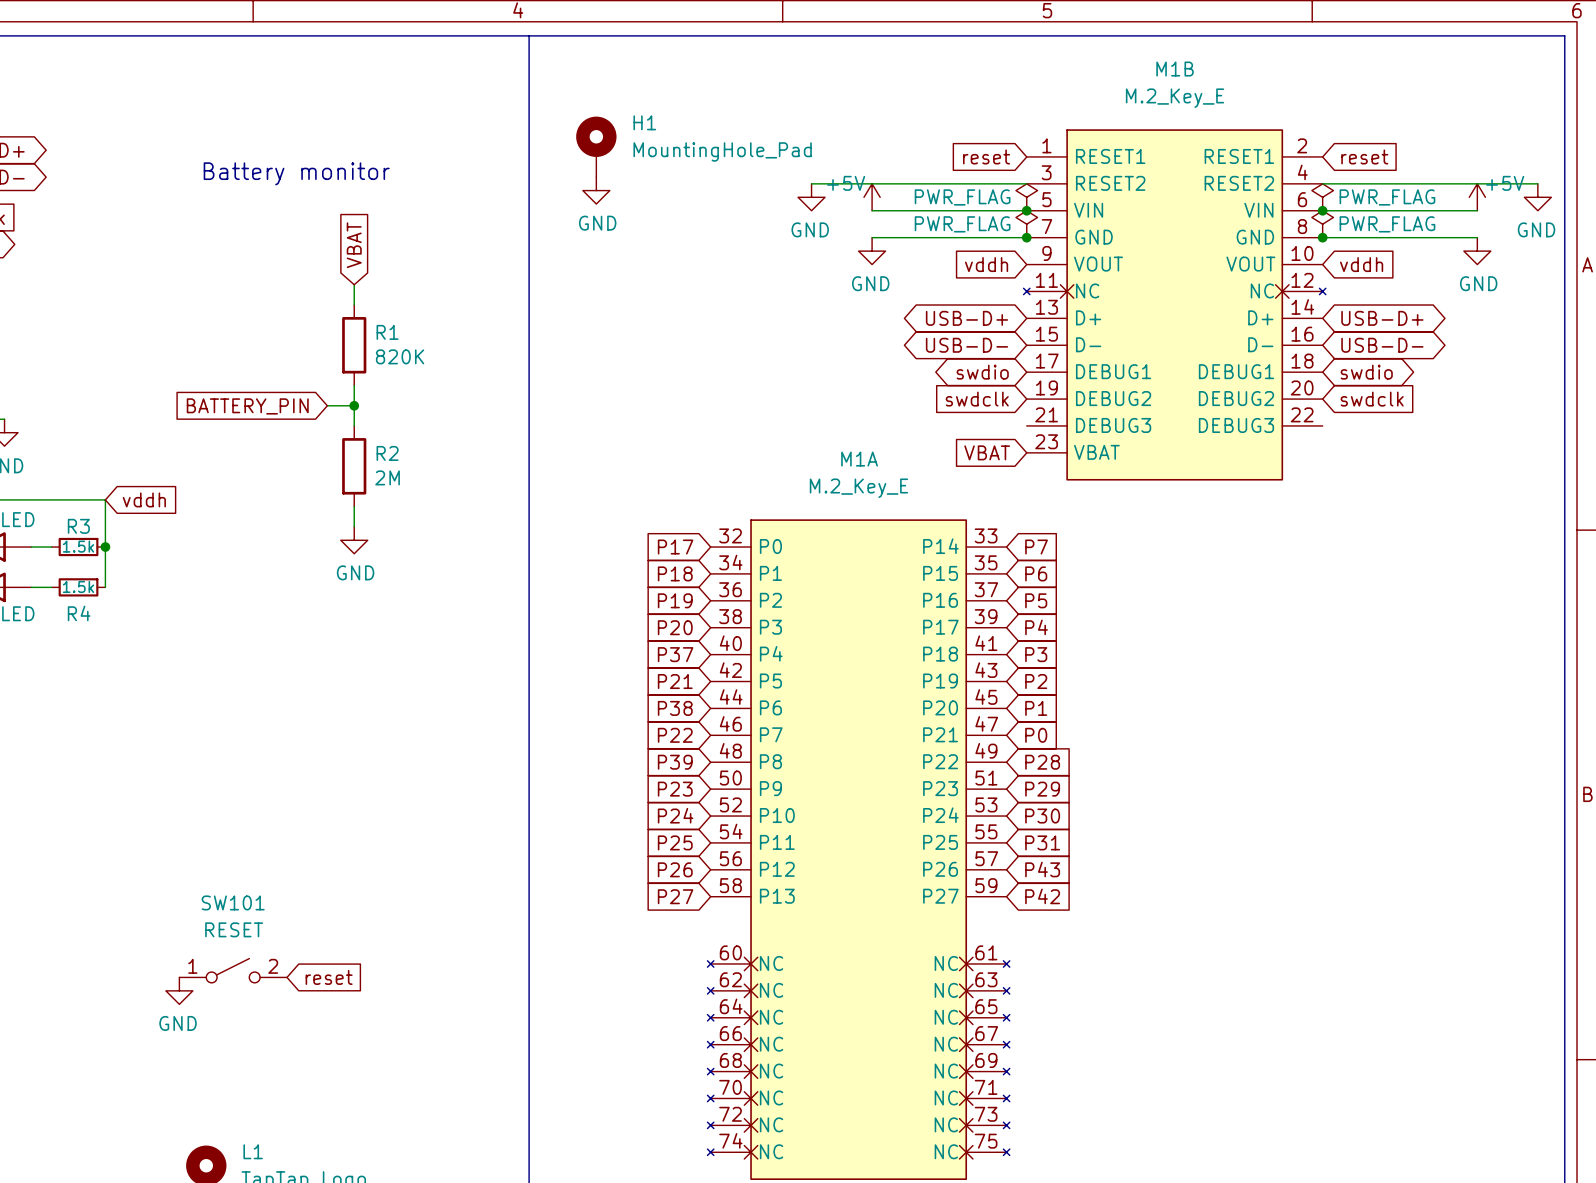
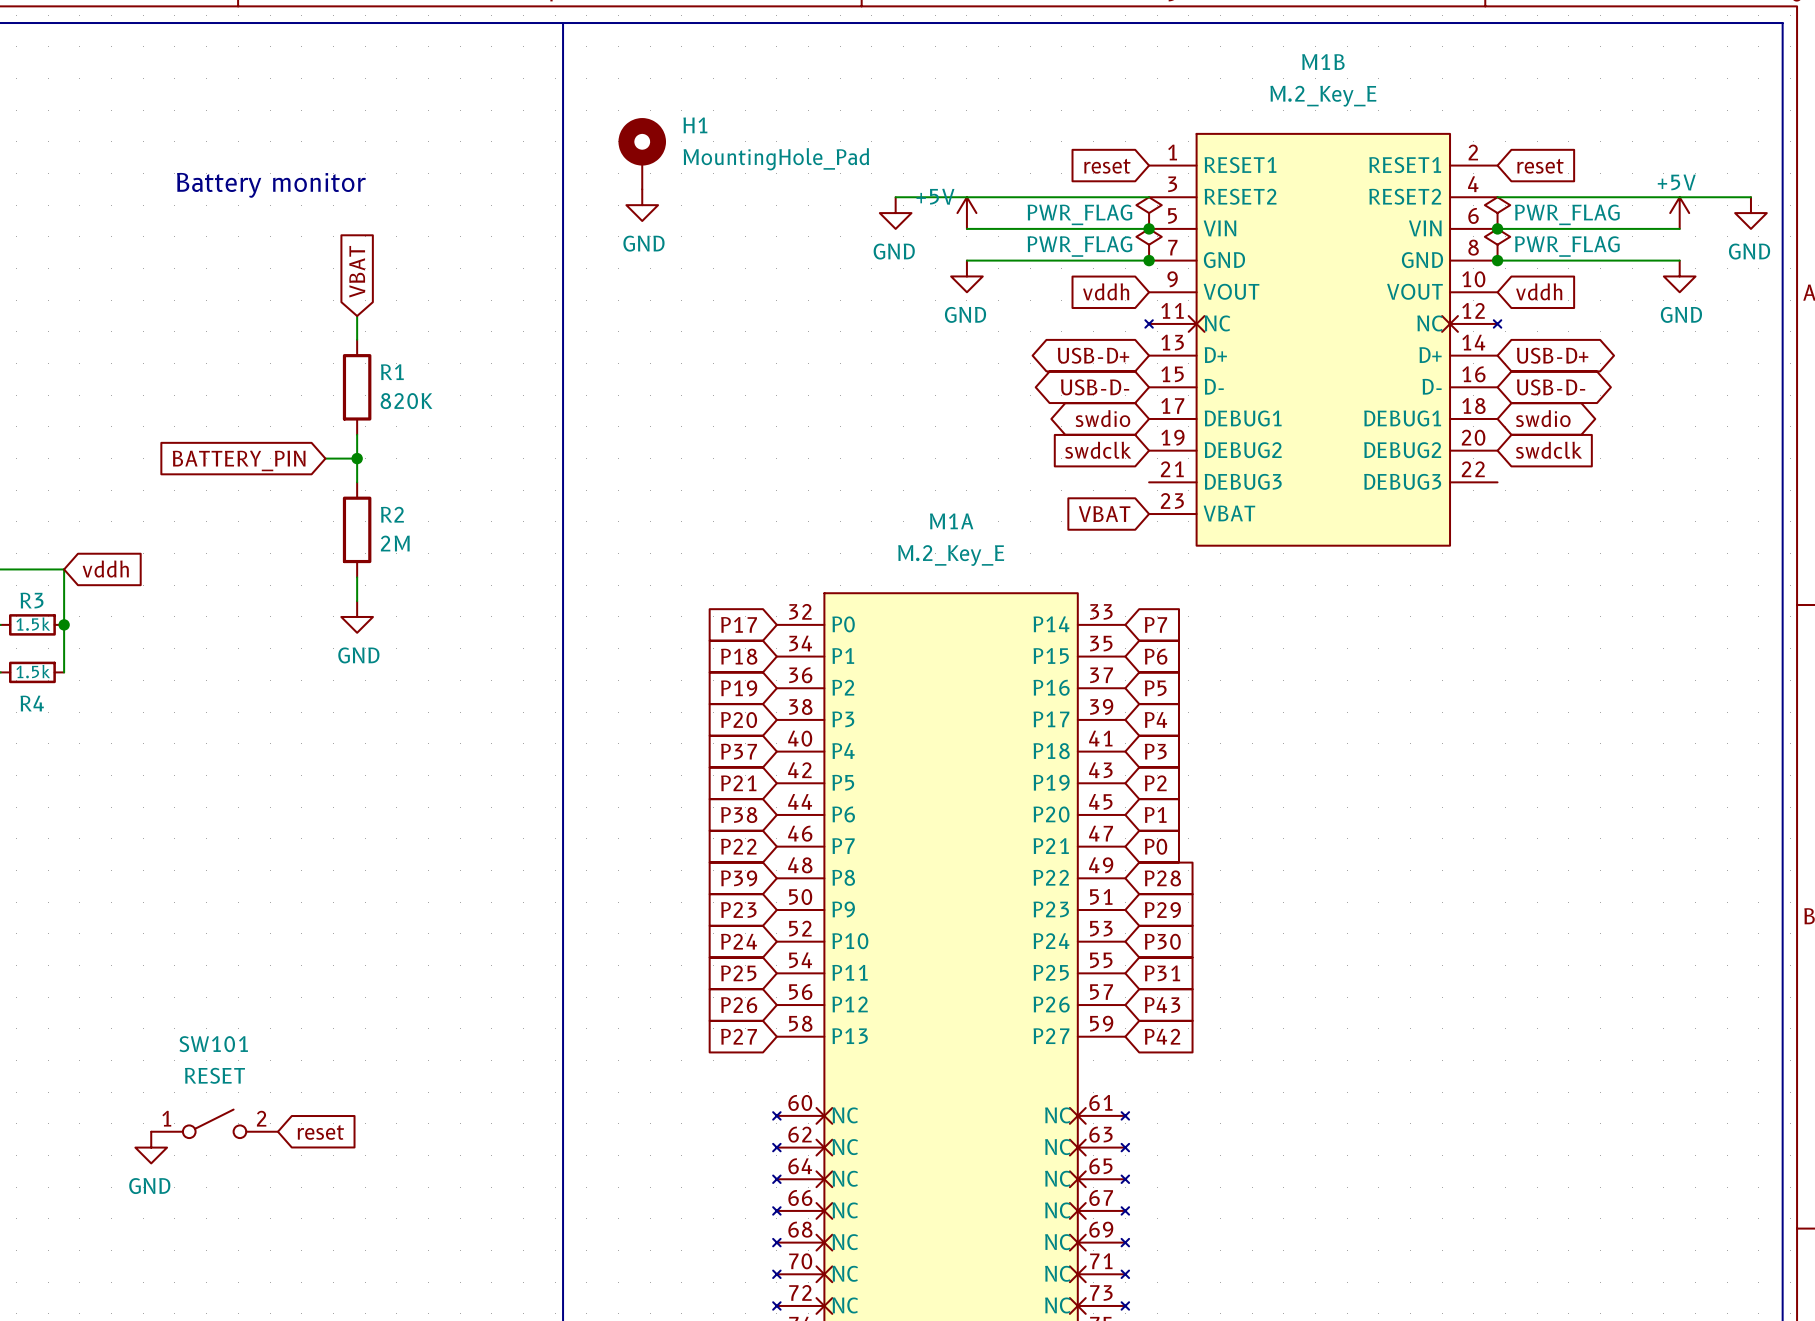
power symbol text position: +5V (1505, 183) -> +5V (1676, 182)

